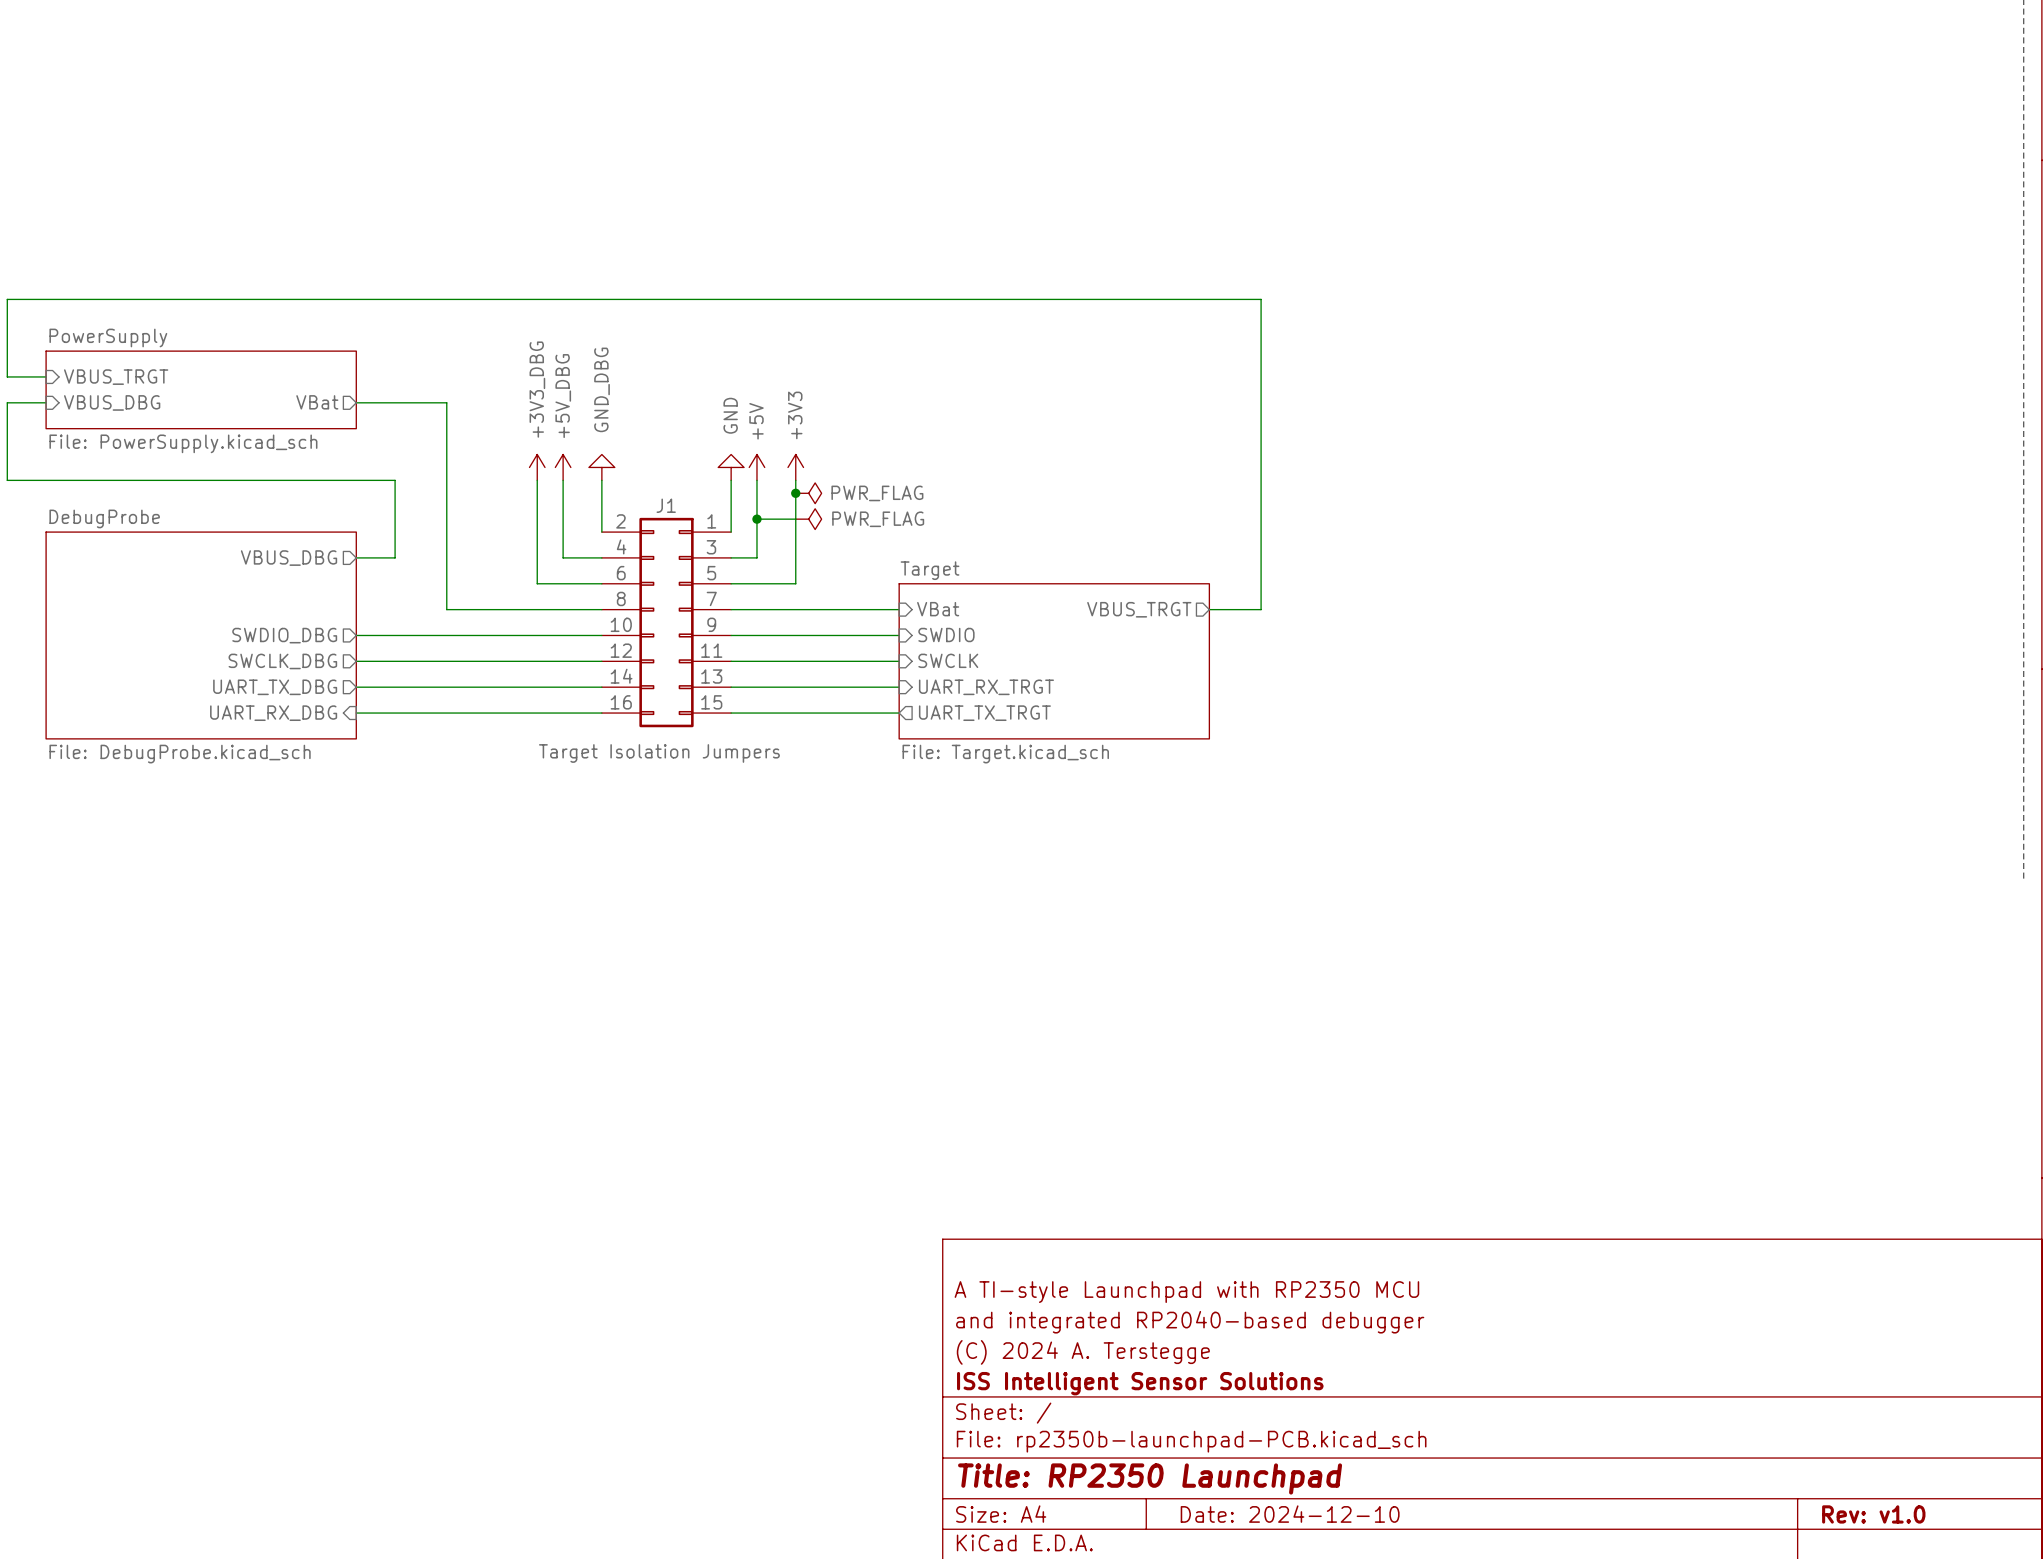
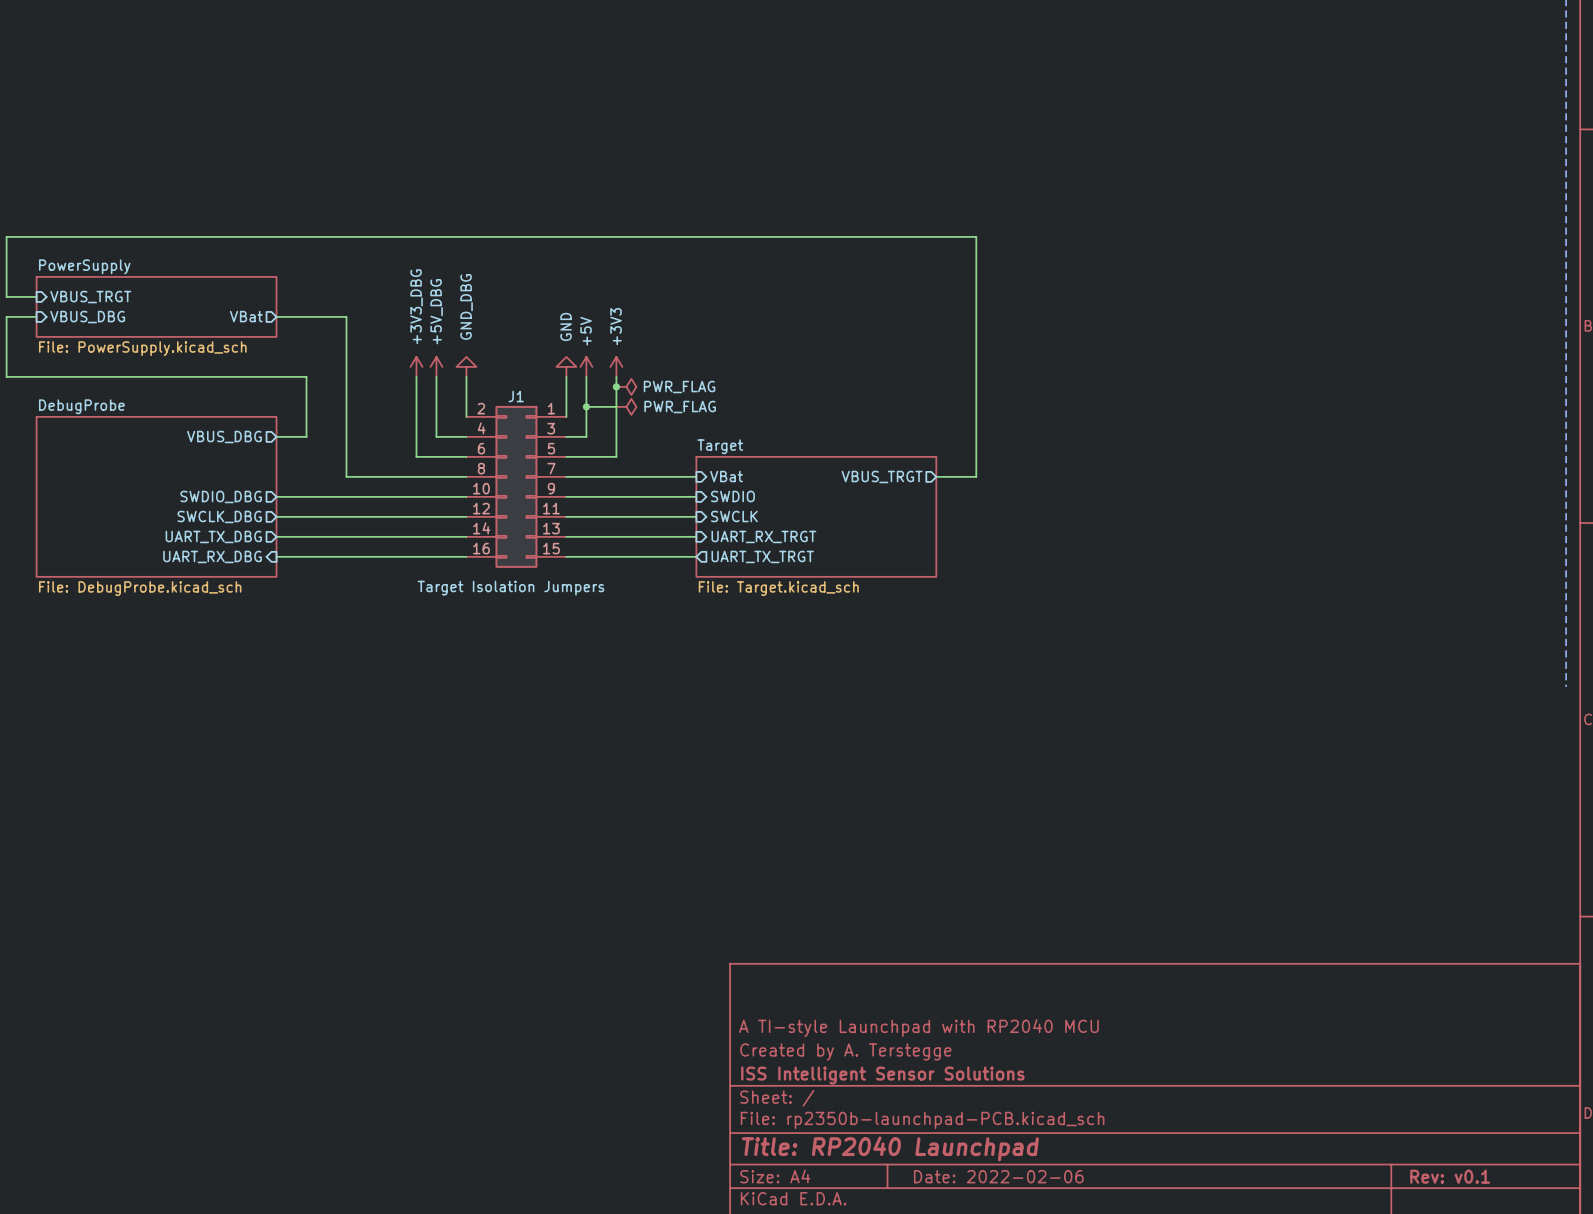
title block: A TI-style Launchpad with RP2350 MCU (1186, 1292) -> none
title block: and integrated RP2040-based debugger (1190, 1322) -> A TI-style Launchpad with RP2040 MCU (918, 1028)
title block: (C) 2024 A. Terstegge (1083, 1352) -> Created by A. Terstegge (845, 1051)
title block: Title: RP2350 Launchpad (1150, 1478) -> Title: RP2040 Launchpad (890, 1148)
title block: Date: 2024-12-10 (1290, 1514) -> Date: 2022-02-06 (998, 1176)
title block: Rev: v1.0 (1873, 1514) -> Rev: v0.1 (1450, 1176)

